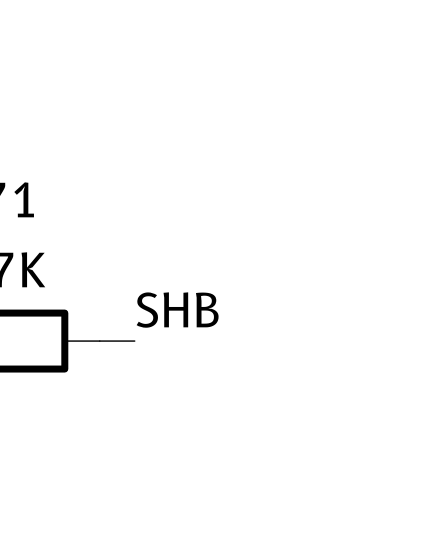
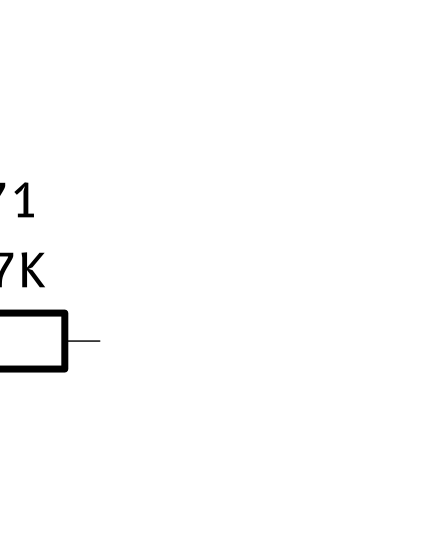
label: SHB (177, 310) -> none
wire: (99, 341) (134, 341) -> none

